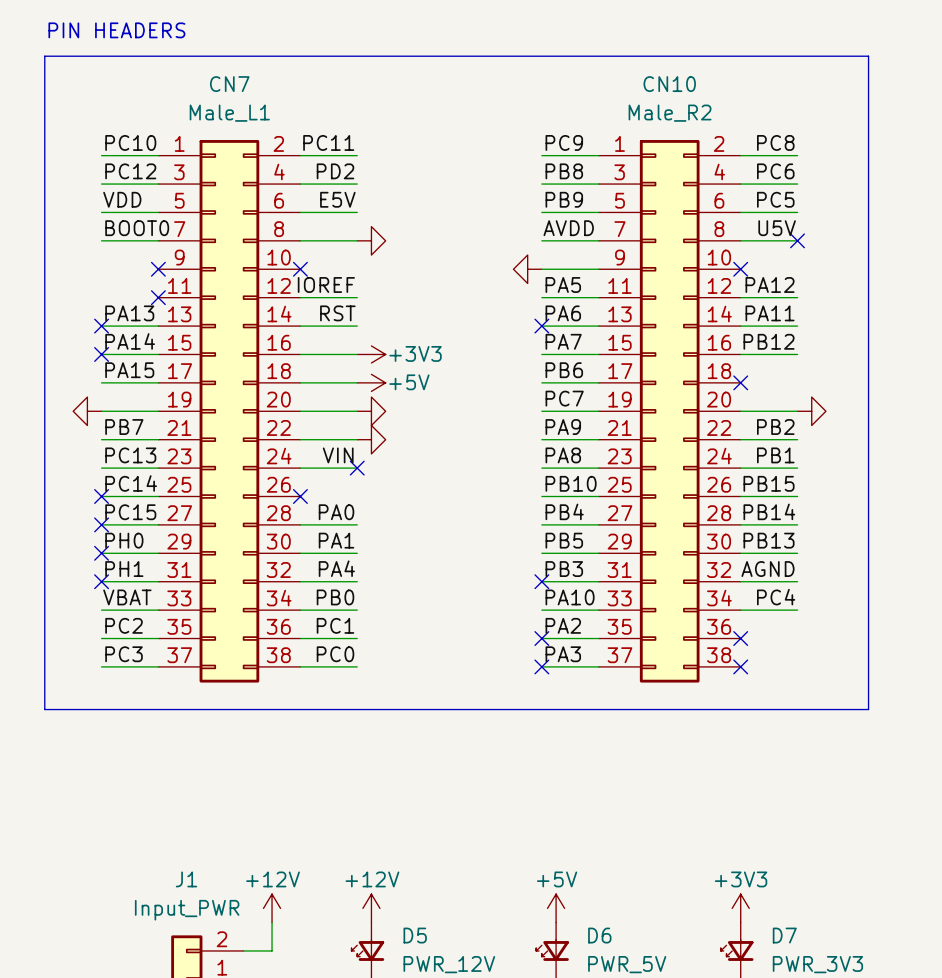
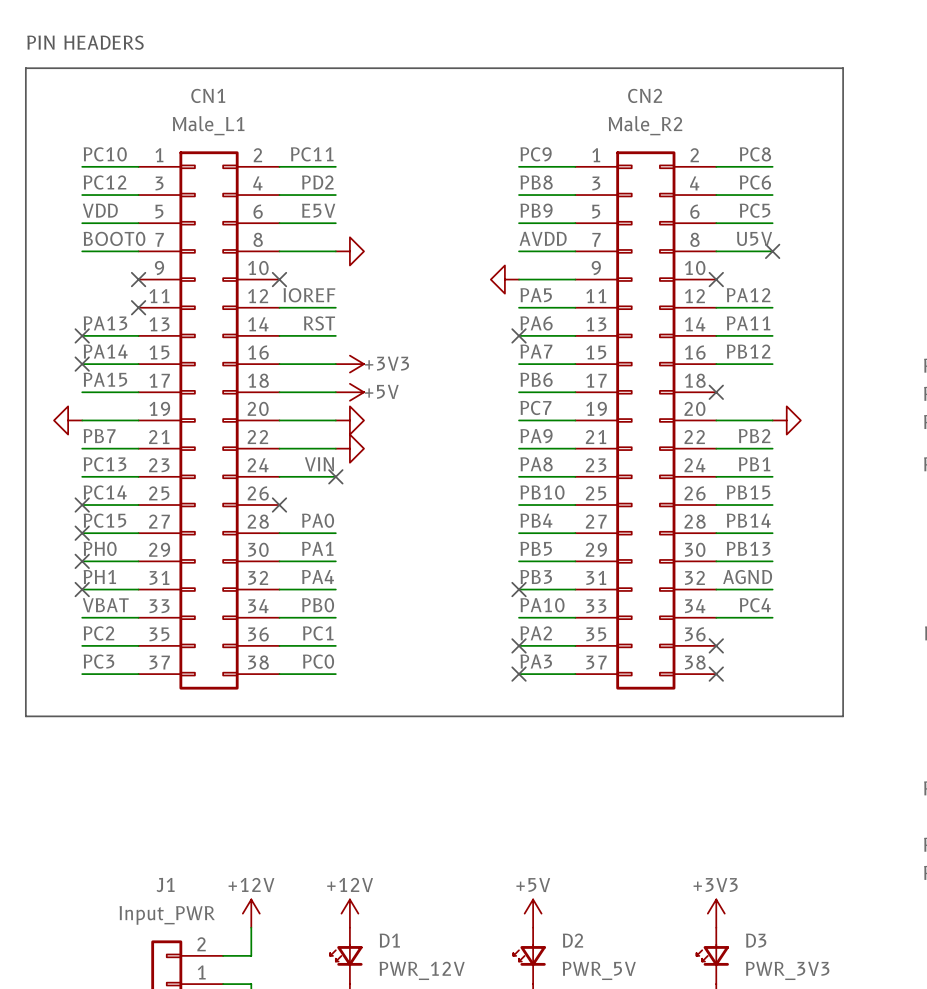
CN7 name: CN7 (229, 84) -> CN1 (208, 95)
CN10 name: CN10 (669, 84) -> CN2 (645, 95)
D5 name: D5 (415, 935) -> D1 (389, 940)
D6 name: D6 (599, 935) -> D2 (572, 940)
D7 name: D7 (784, 935) -> D3 (756, 940)

